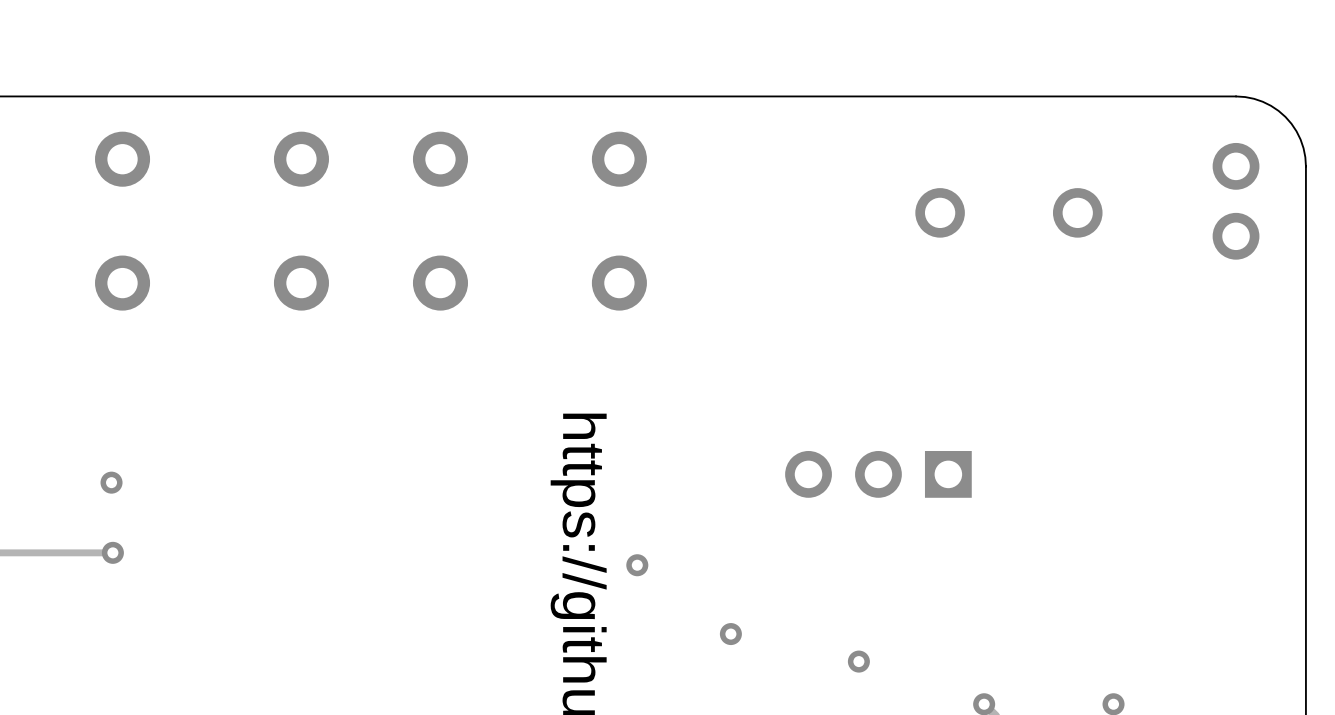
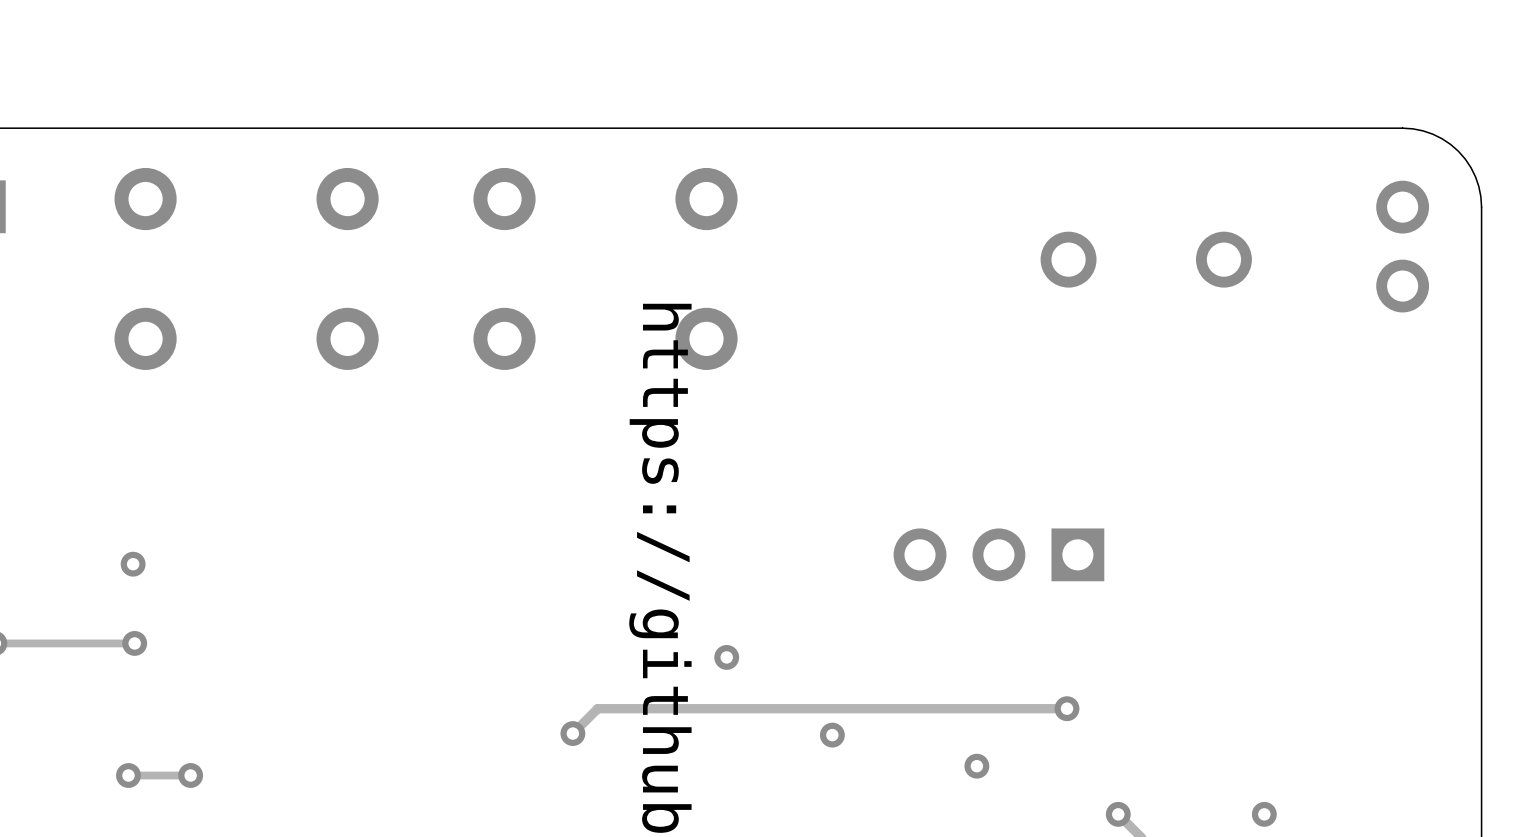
track: none -> (1067, 708) (597, 708) (572, 733)
via: none -> (1067, 708)
via: none -> (572, 733)
via: none -> (128, 775)
track: none -> (190, 775) (128, 775)
via: none -> (190, 775)

